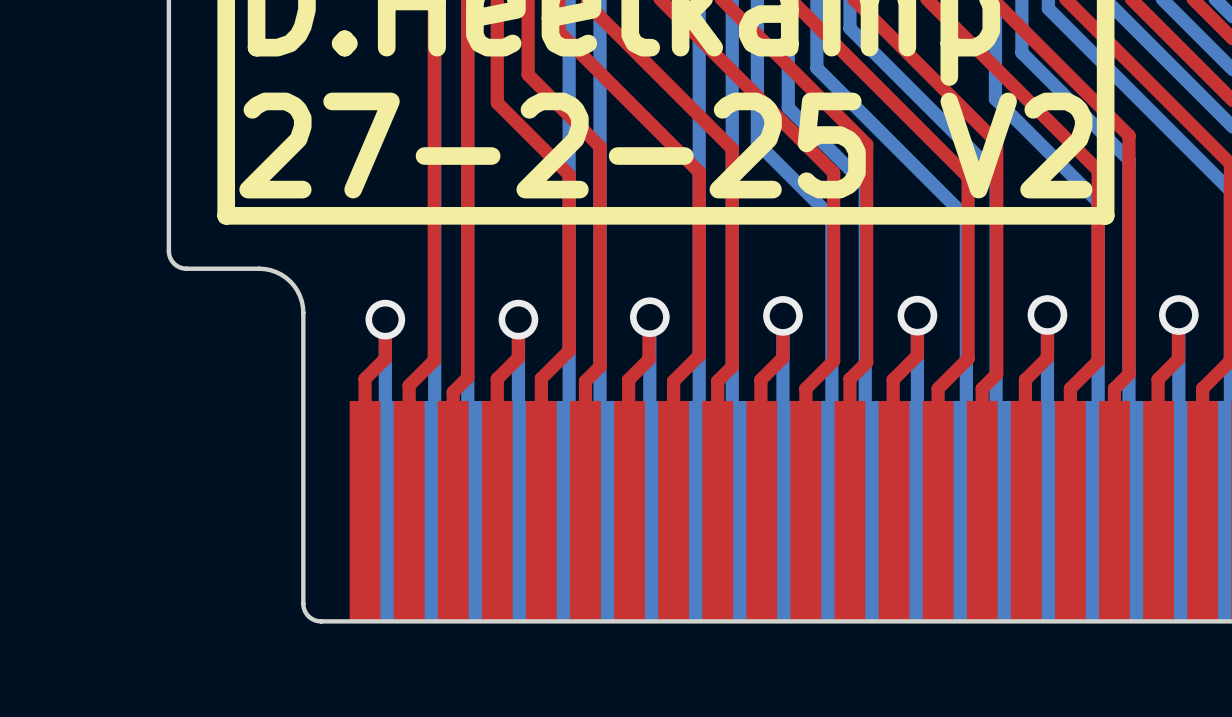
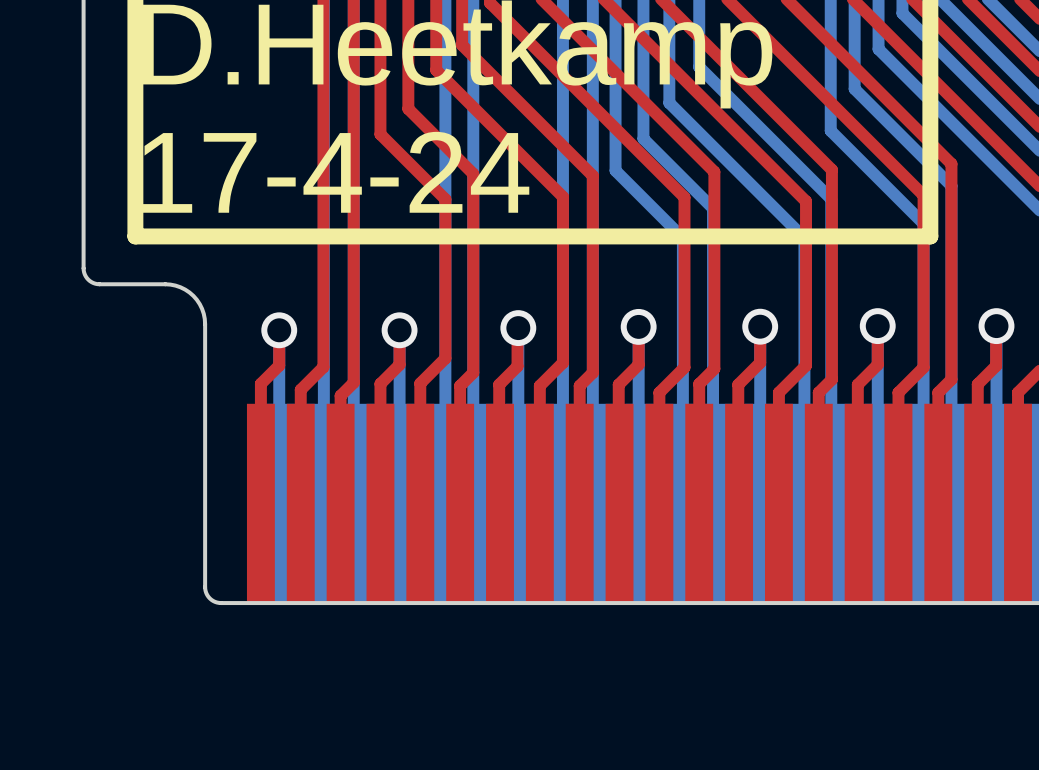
text: 27-2-25 V2 (665, 145) -> 17-4-24 (335, 172)

